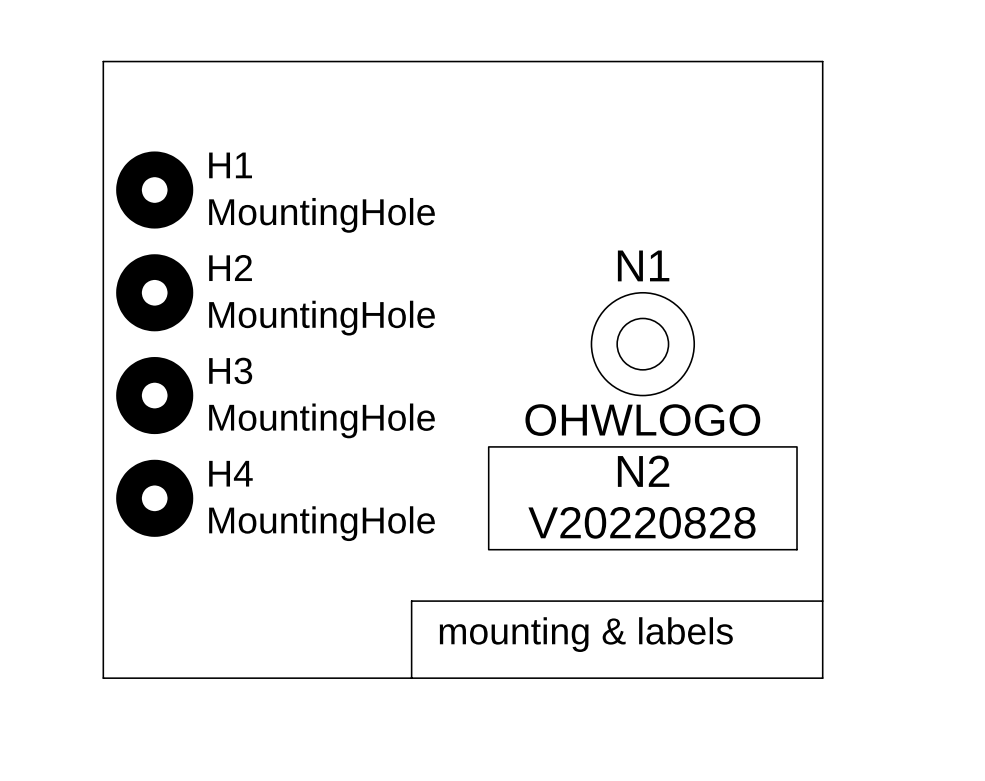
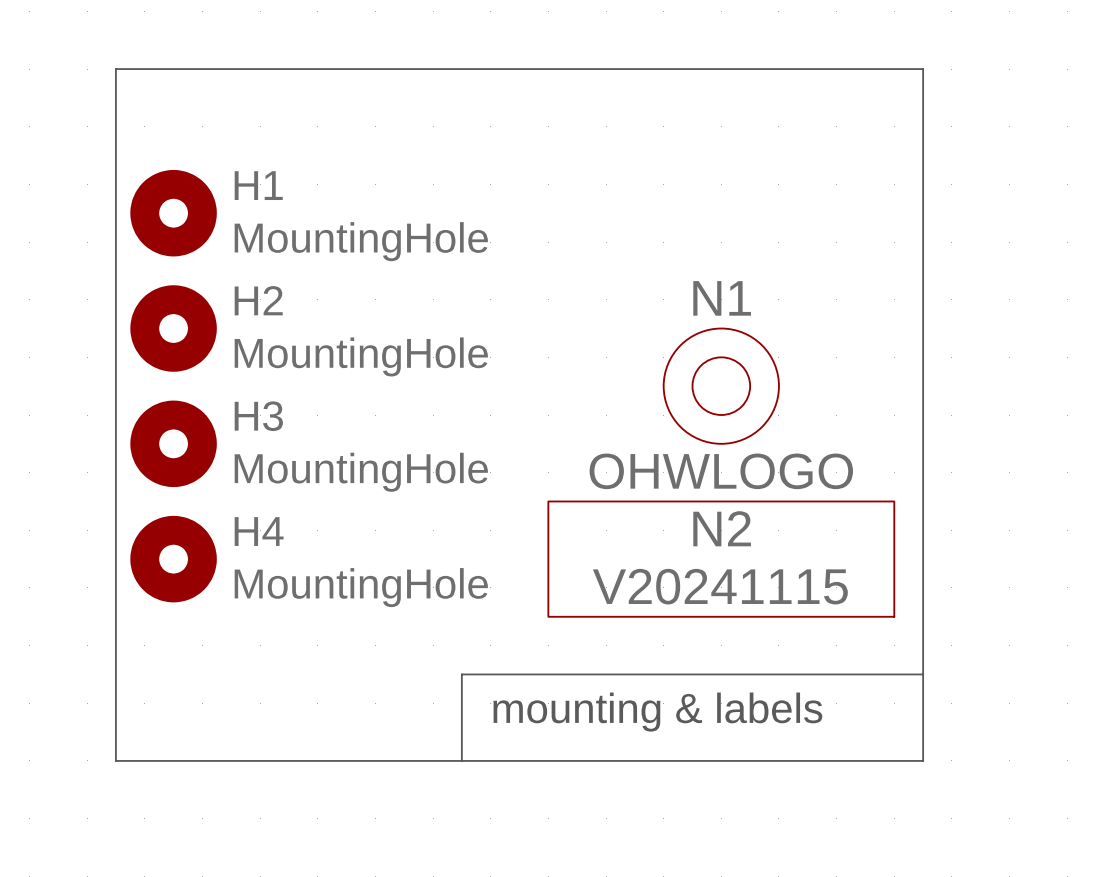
N2 value: V20220828 (641, 522) -> V20241115 (720, 586)

